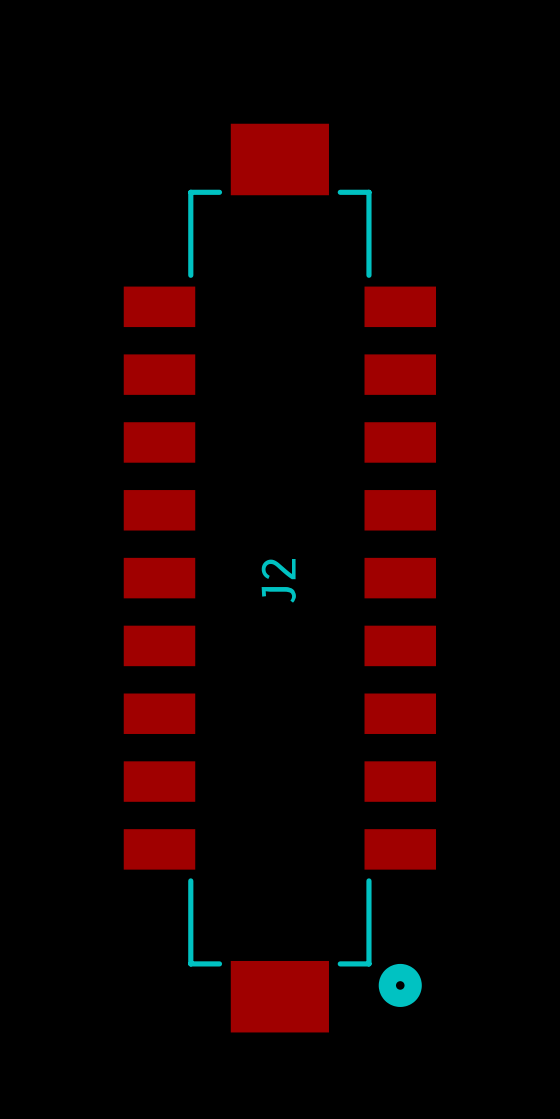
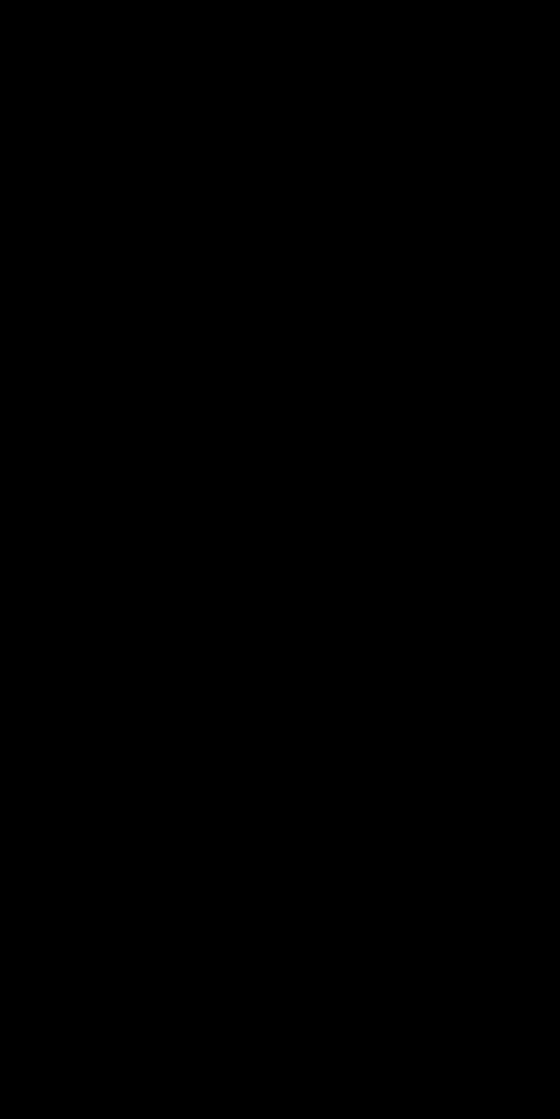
J2: (279, 578) -> none

